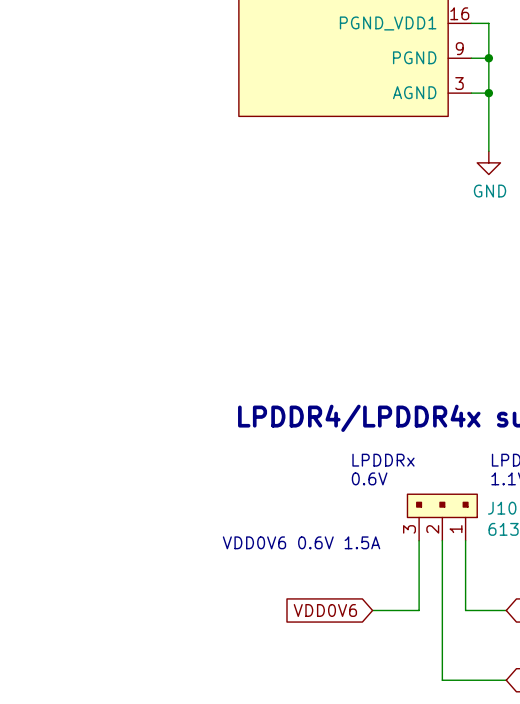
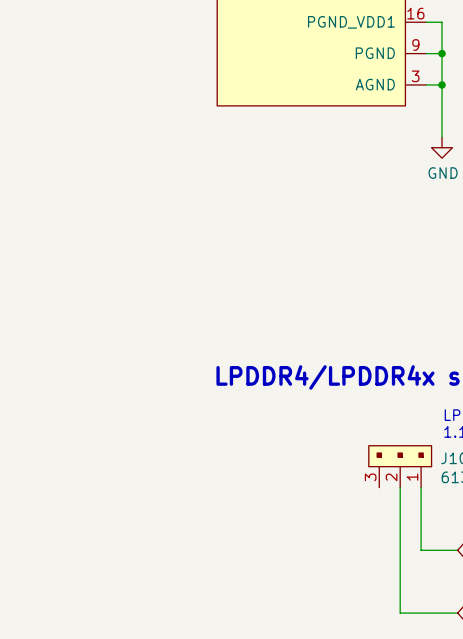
text: LPDDRx (383, 460) -> none
text: 0.6V (369, 478) -> none
wire: (419, 540) (419, 610) (372, 610) -> none
text: VDD0V6 0.6V 1.5A (301, 542) -> none
global label: VDD0V6 (325, 610) -> none

